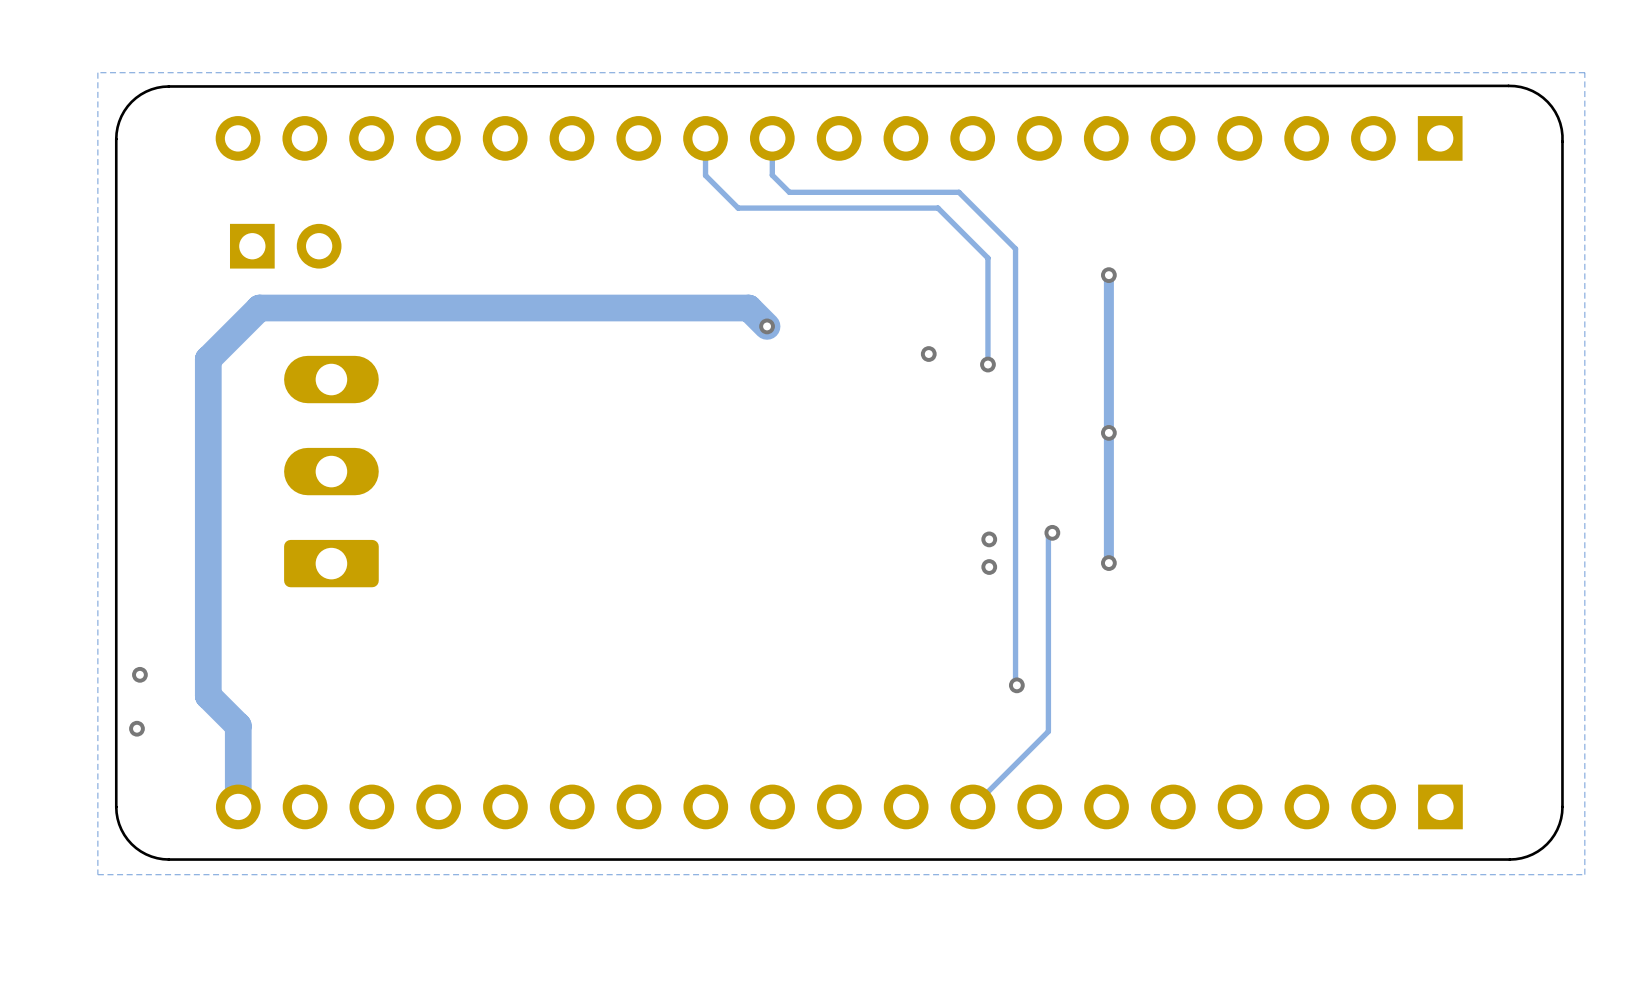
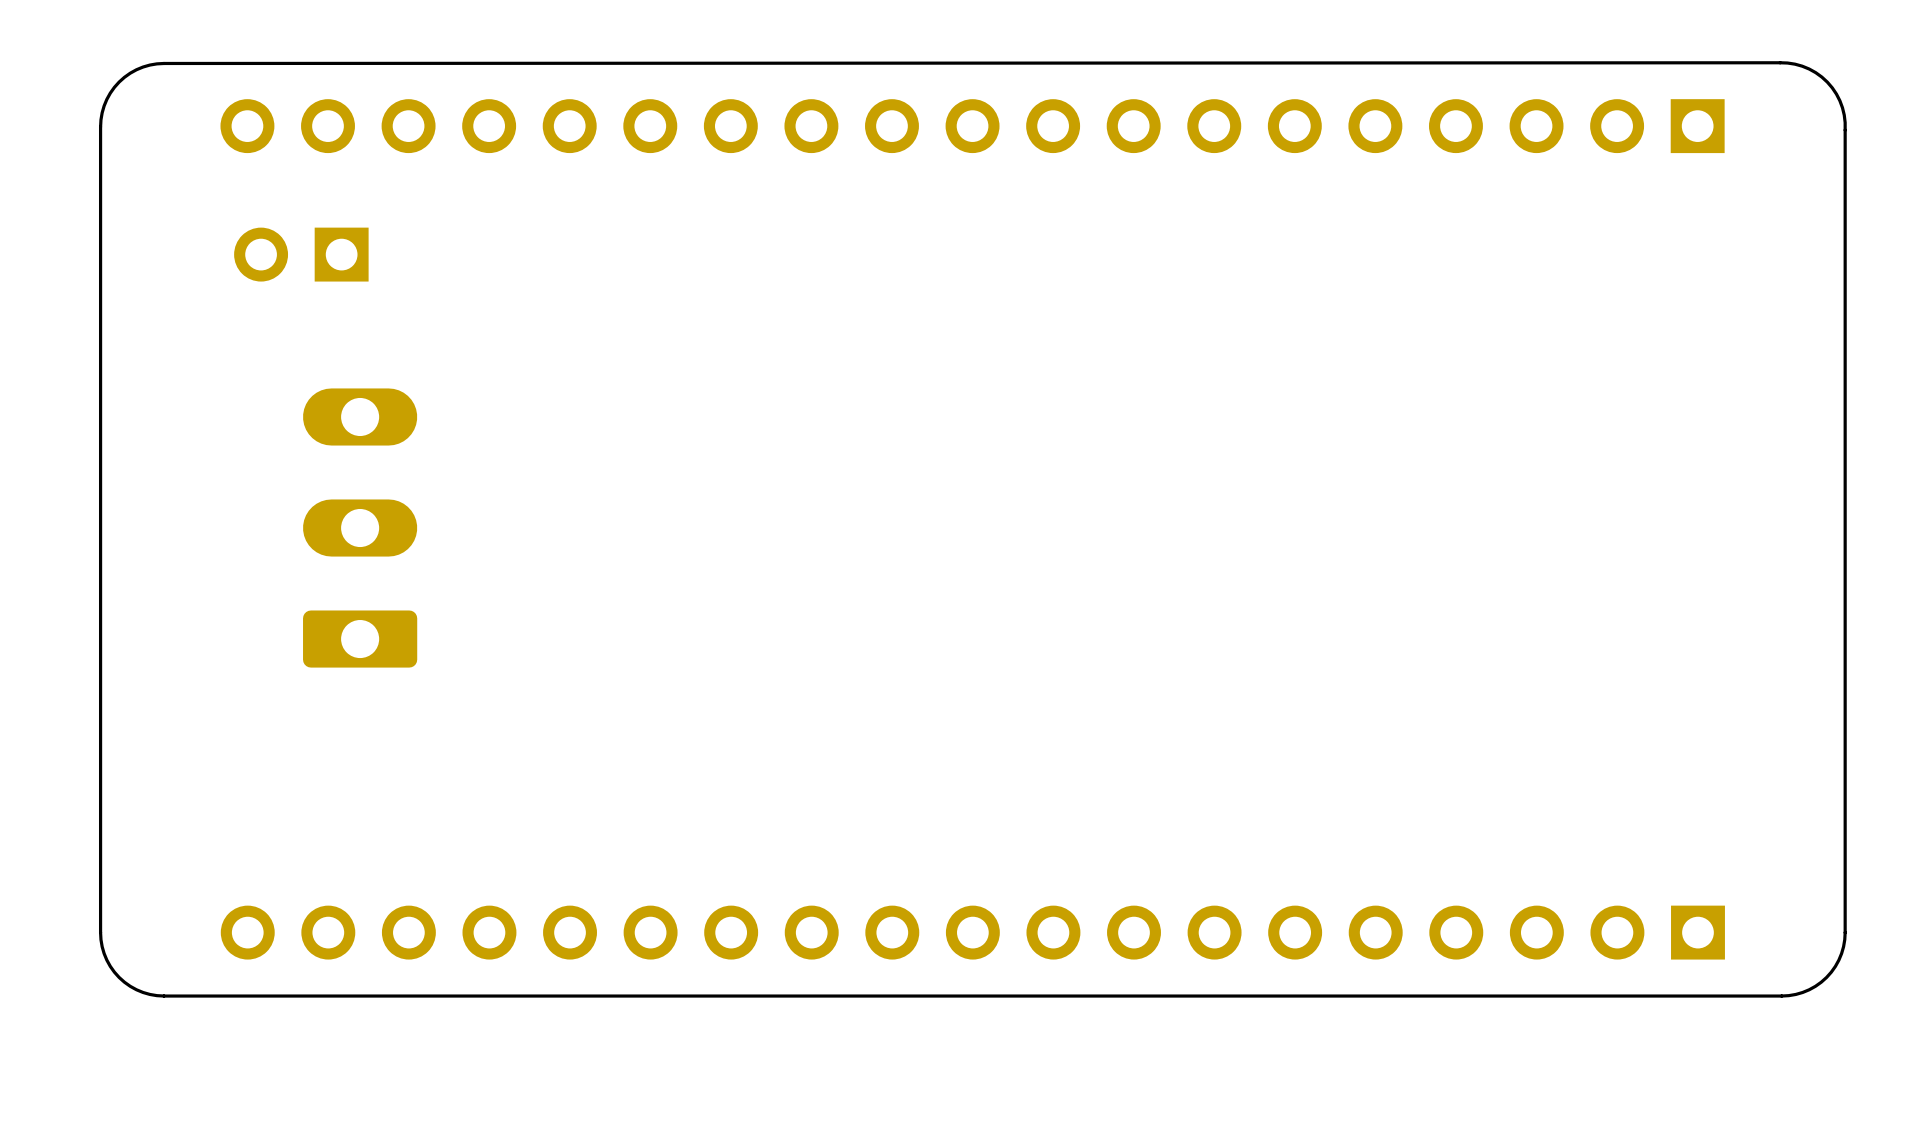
zone outline: (1584, 72) (1584, 874) (97, 874) (97, 72) (1584, 72) -> none
track: (705, 138) (705, 175) (738, 208) (937, 208) (987, 258) (987, 364) -> none
track: (772, 138) (772, 175) (789, 192) (959, 192) (1015, 248) (1016, 685) -> none
part rotation: 0° (285, 246) -> 180° (301, 254)
track: (1108, 275) (1108, 563) -> none
via: (1108, 275) -> none
track: (767, 326) (748, 308) (259, 308) (208, 359) (208, 695) (238, 725) (238, 806) -> none
via: (767, 326) -> none
via: (928, 354) -> none
via: (987, 364) -> none
via: (1108, 432) -> none
track: (1052, 532) (1048, 536) (1048, 731) (972, 806) -> none
via: (1052, 532) -> none
via: (989, 539) -> none
via: (1108, 563) -> none
via: (989, 567) -> none
via: (139, 674) -> none
via: (1016, 685) -> none
via: (136, 728) -> none

